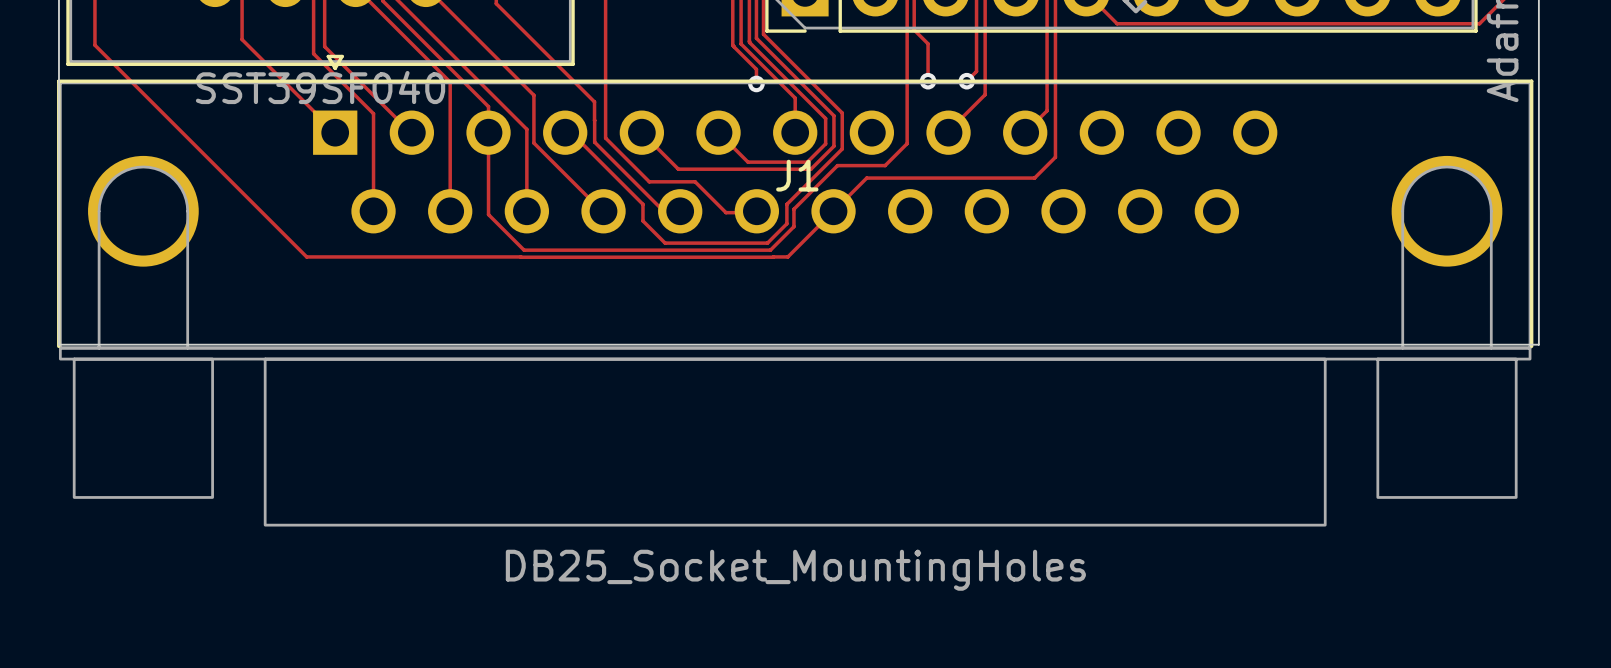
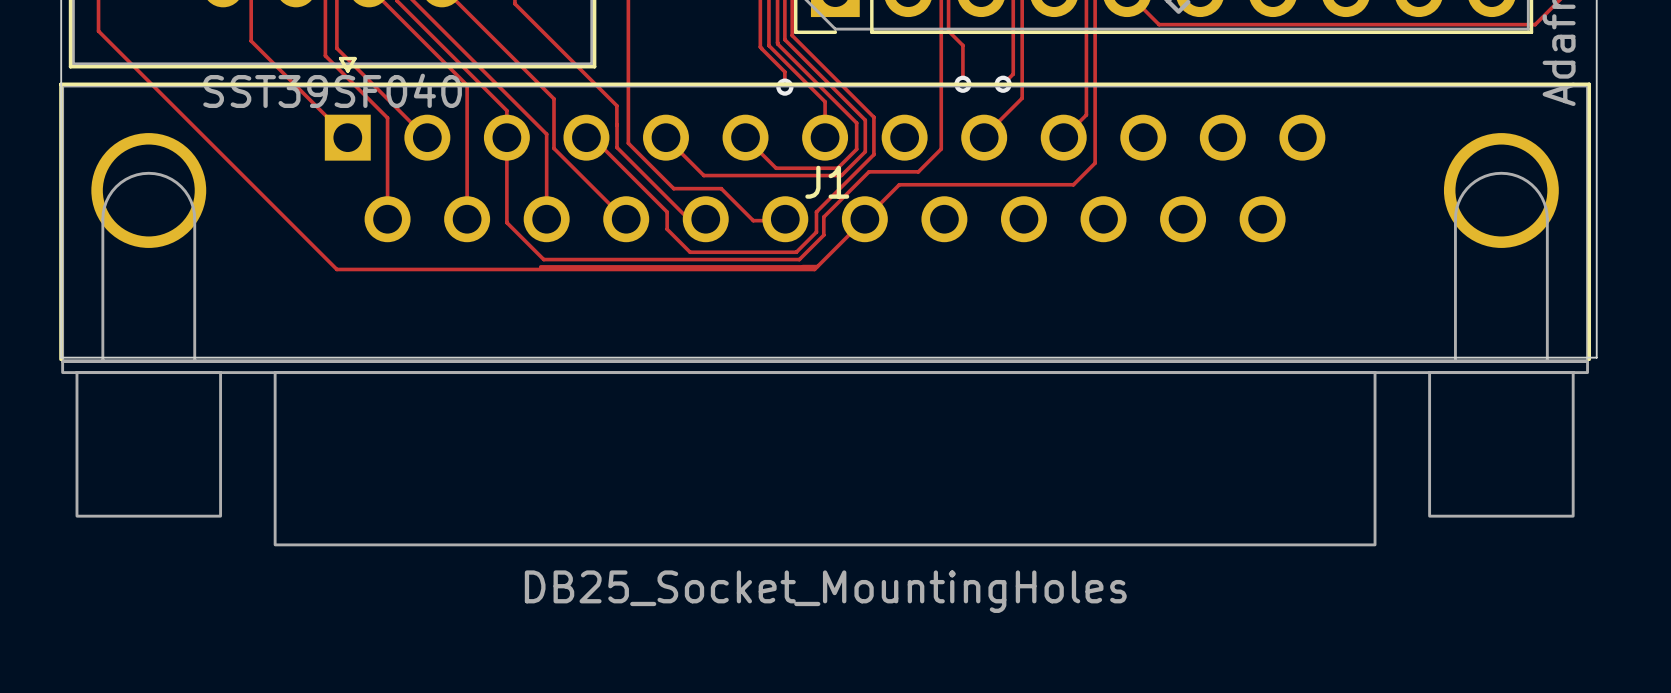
track: (94, 29) (94, 45) (306, 256) (520, 256) -> (98, 31) (336, 269) (814, 269) (817, 266)
J1 footprint: [57, 54, 1534, 527] -> [59, 56, 1591, 547]

